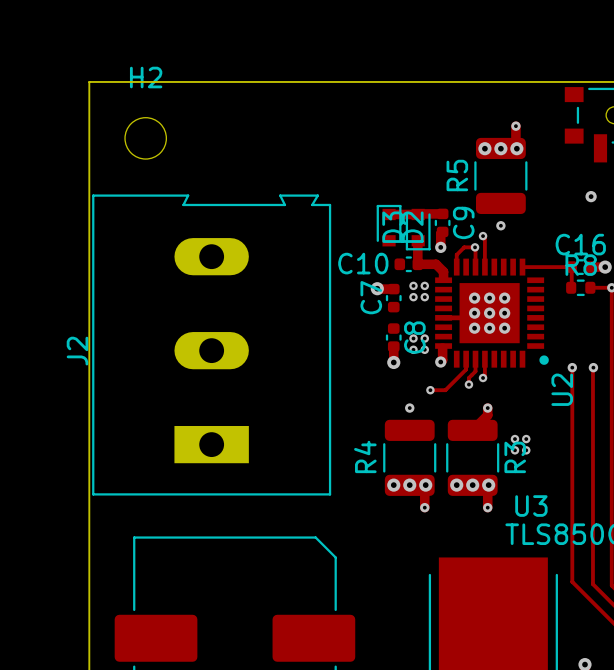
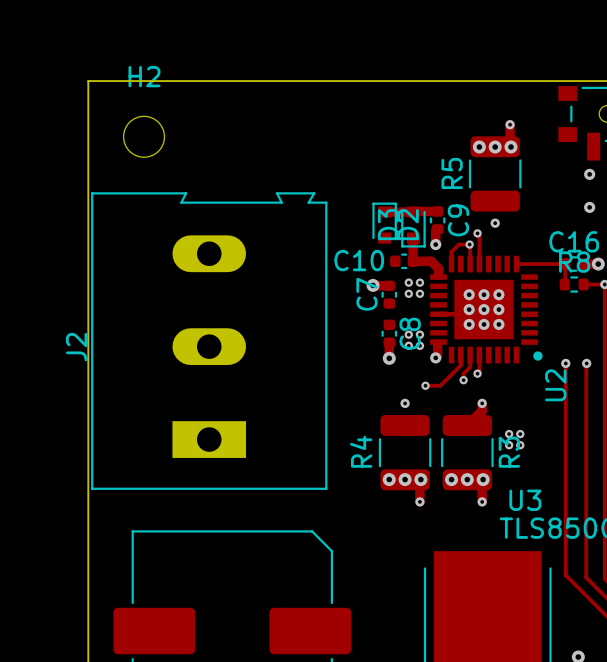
via: none -> (589, 174)
via: (591, 196) -> none
via: none -> (589, 207)

